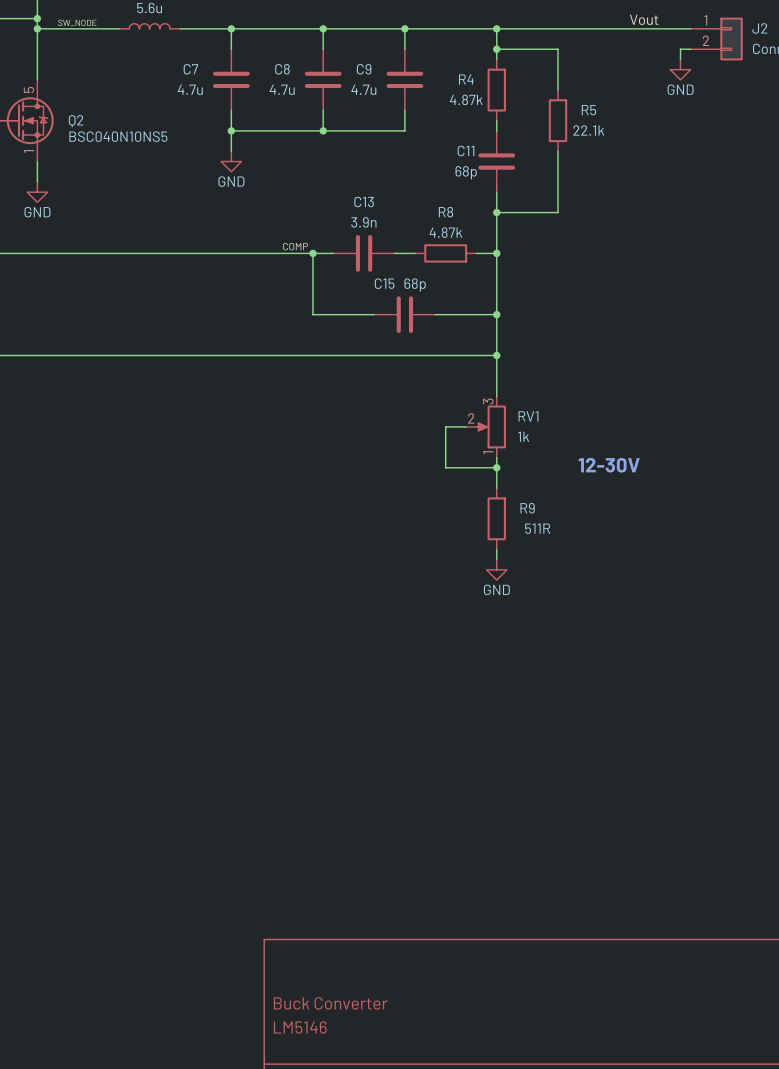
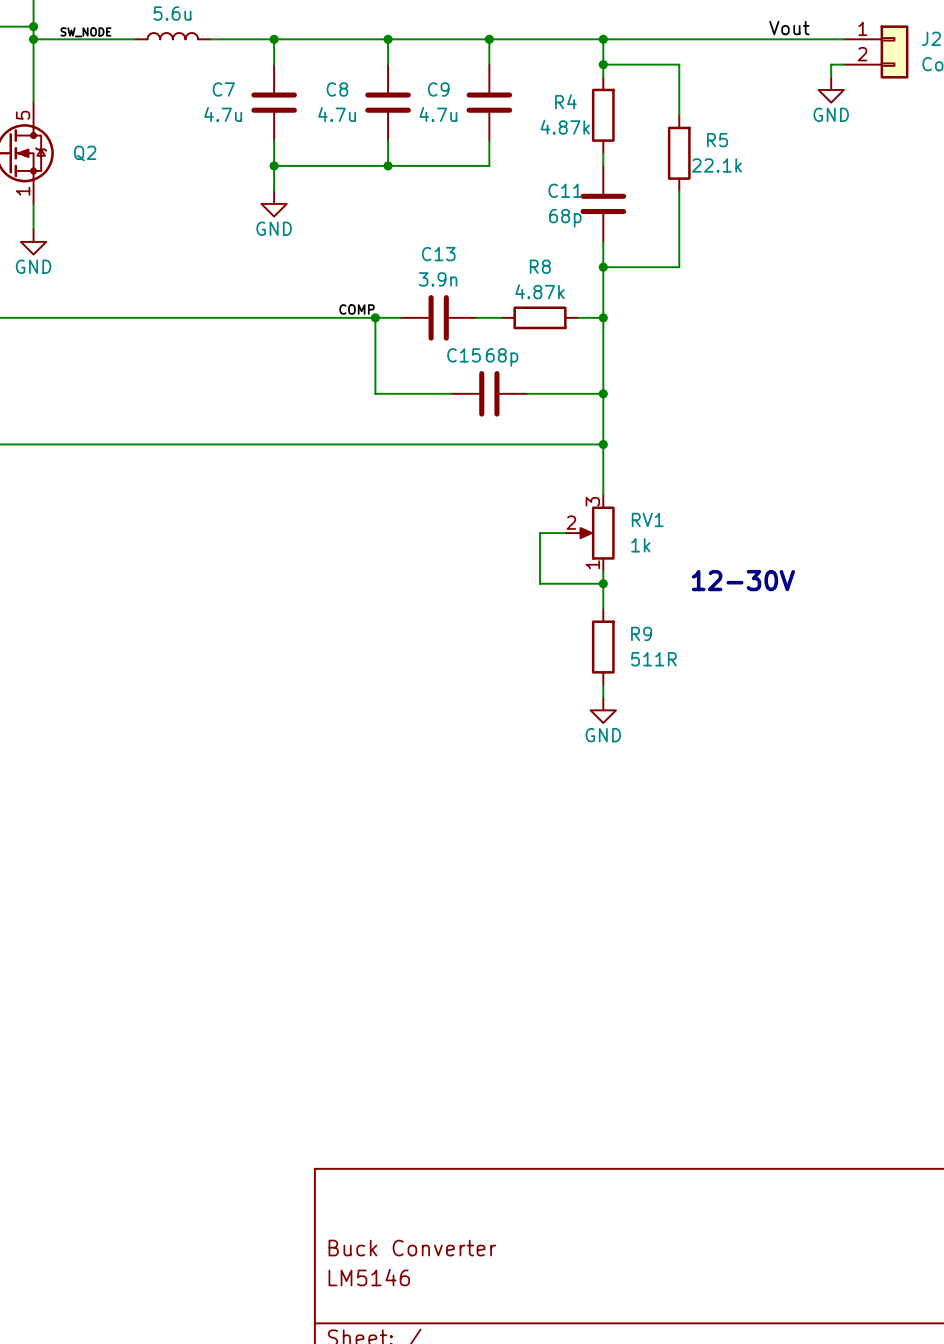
Q2 value: BSC040N10NS5 (118, 136) -> none

